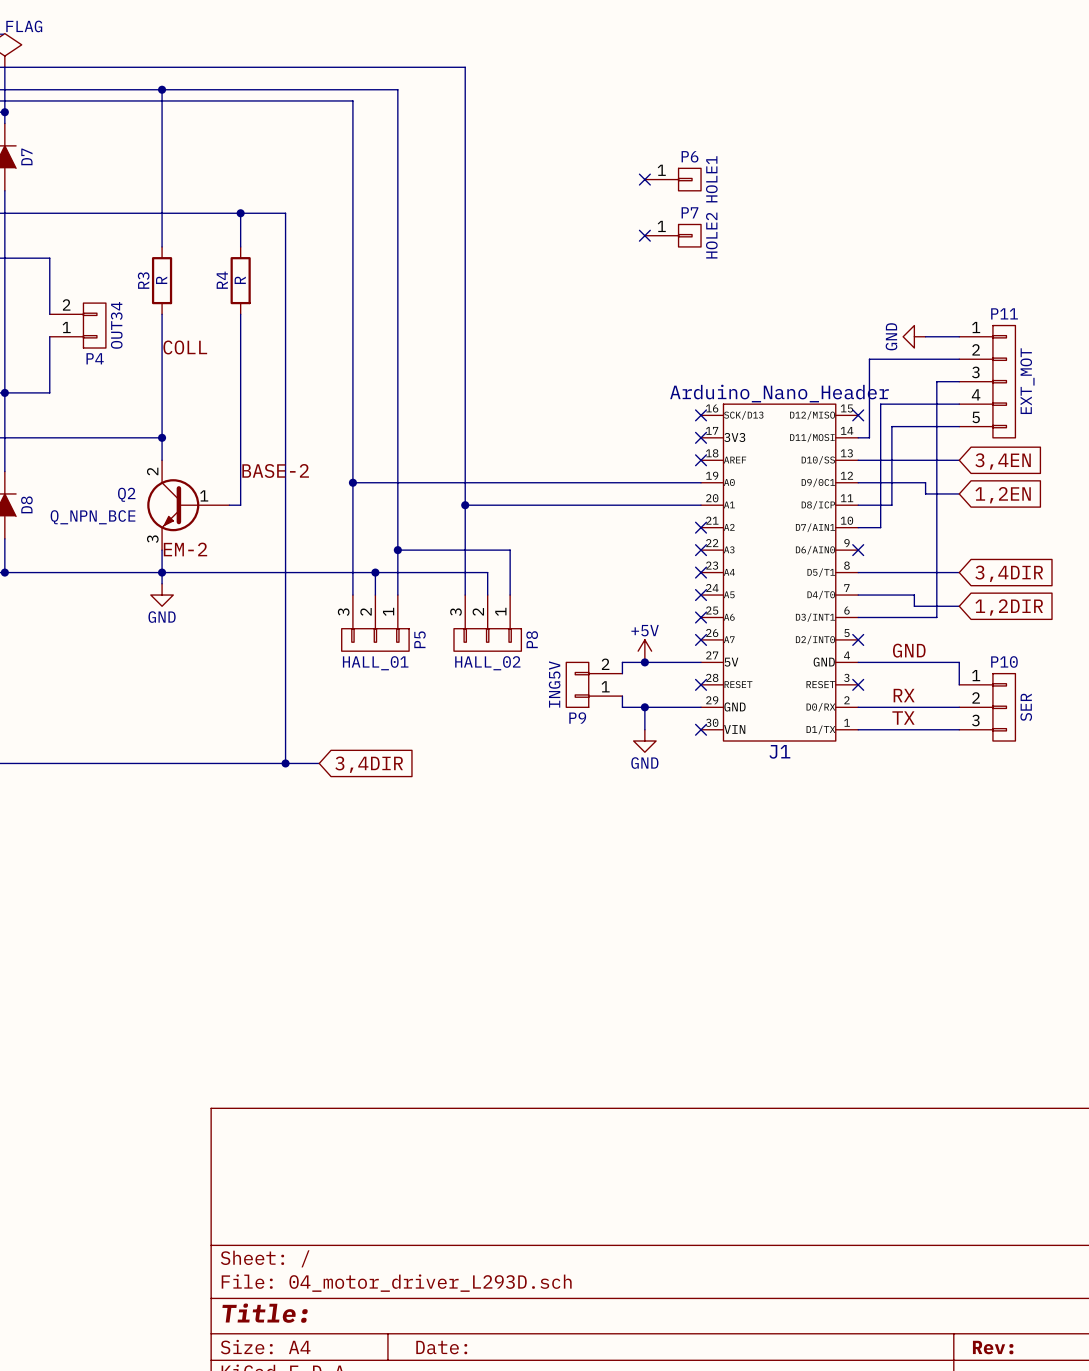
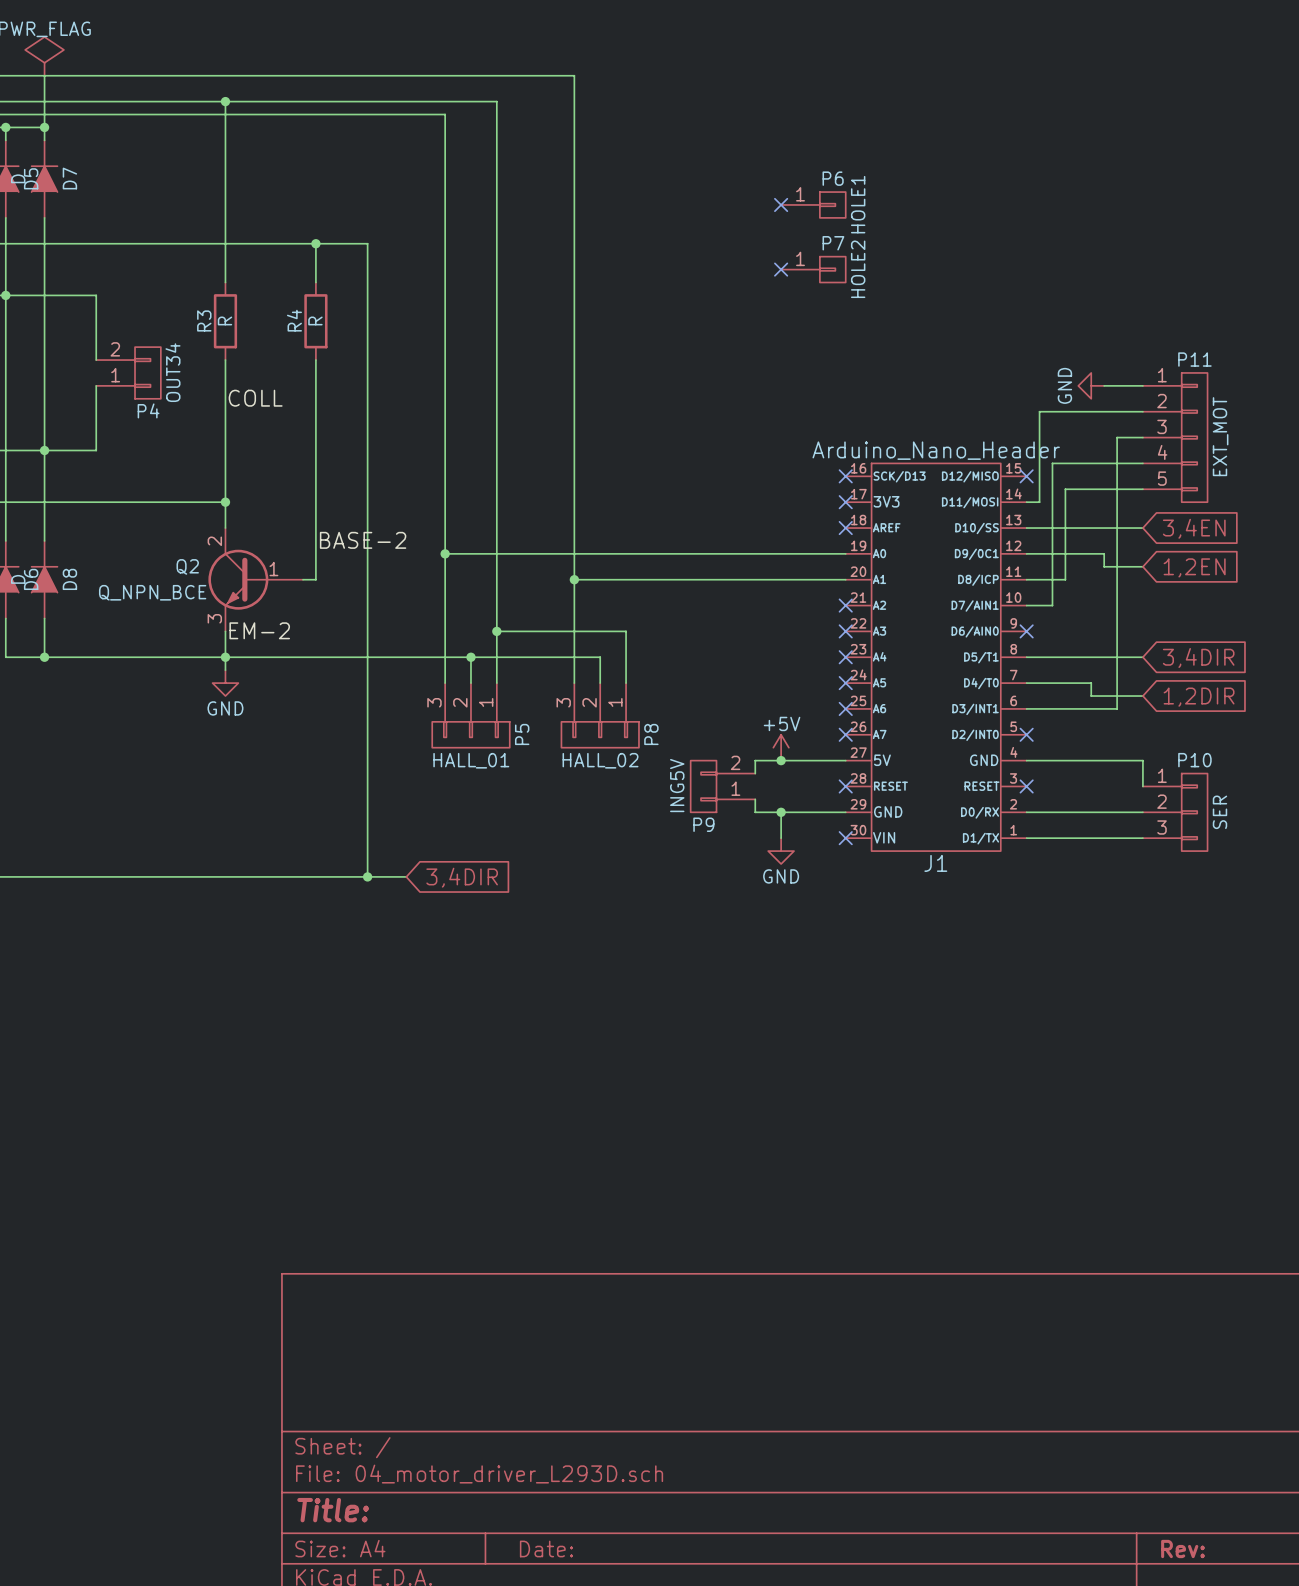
label: GND (909, 650) -> none
label: RX (904, 695) -> none
label: TX (903, 718) -> none

